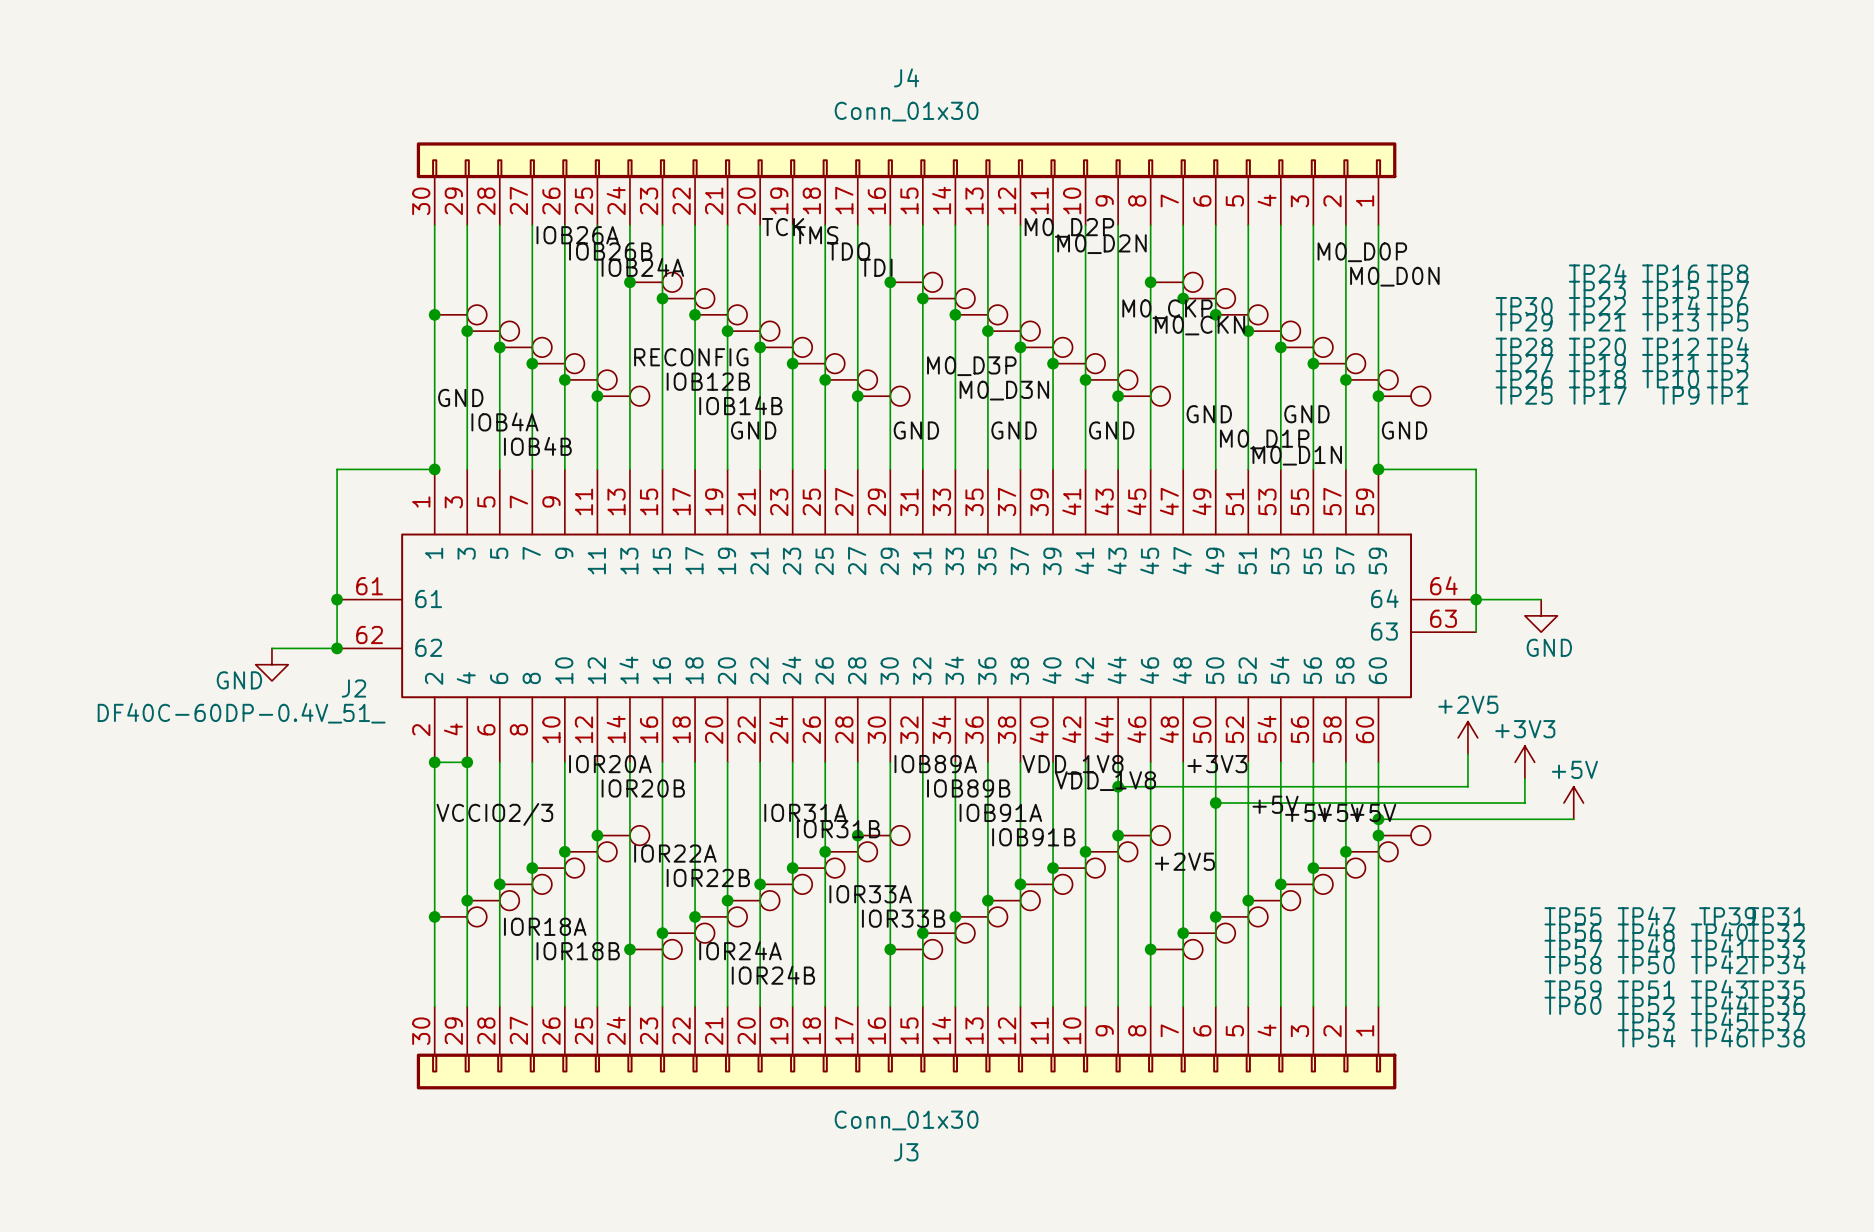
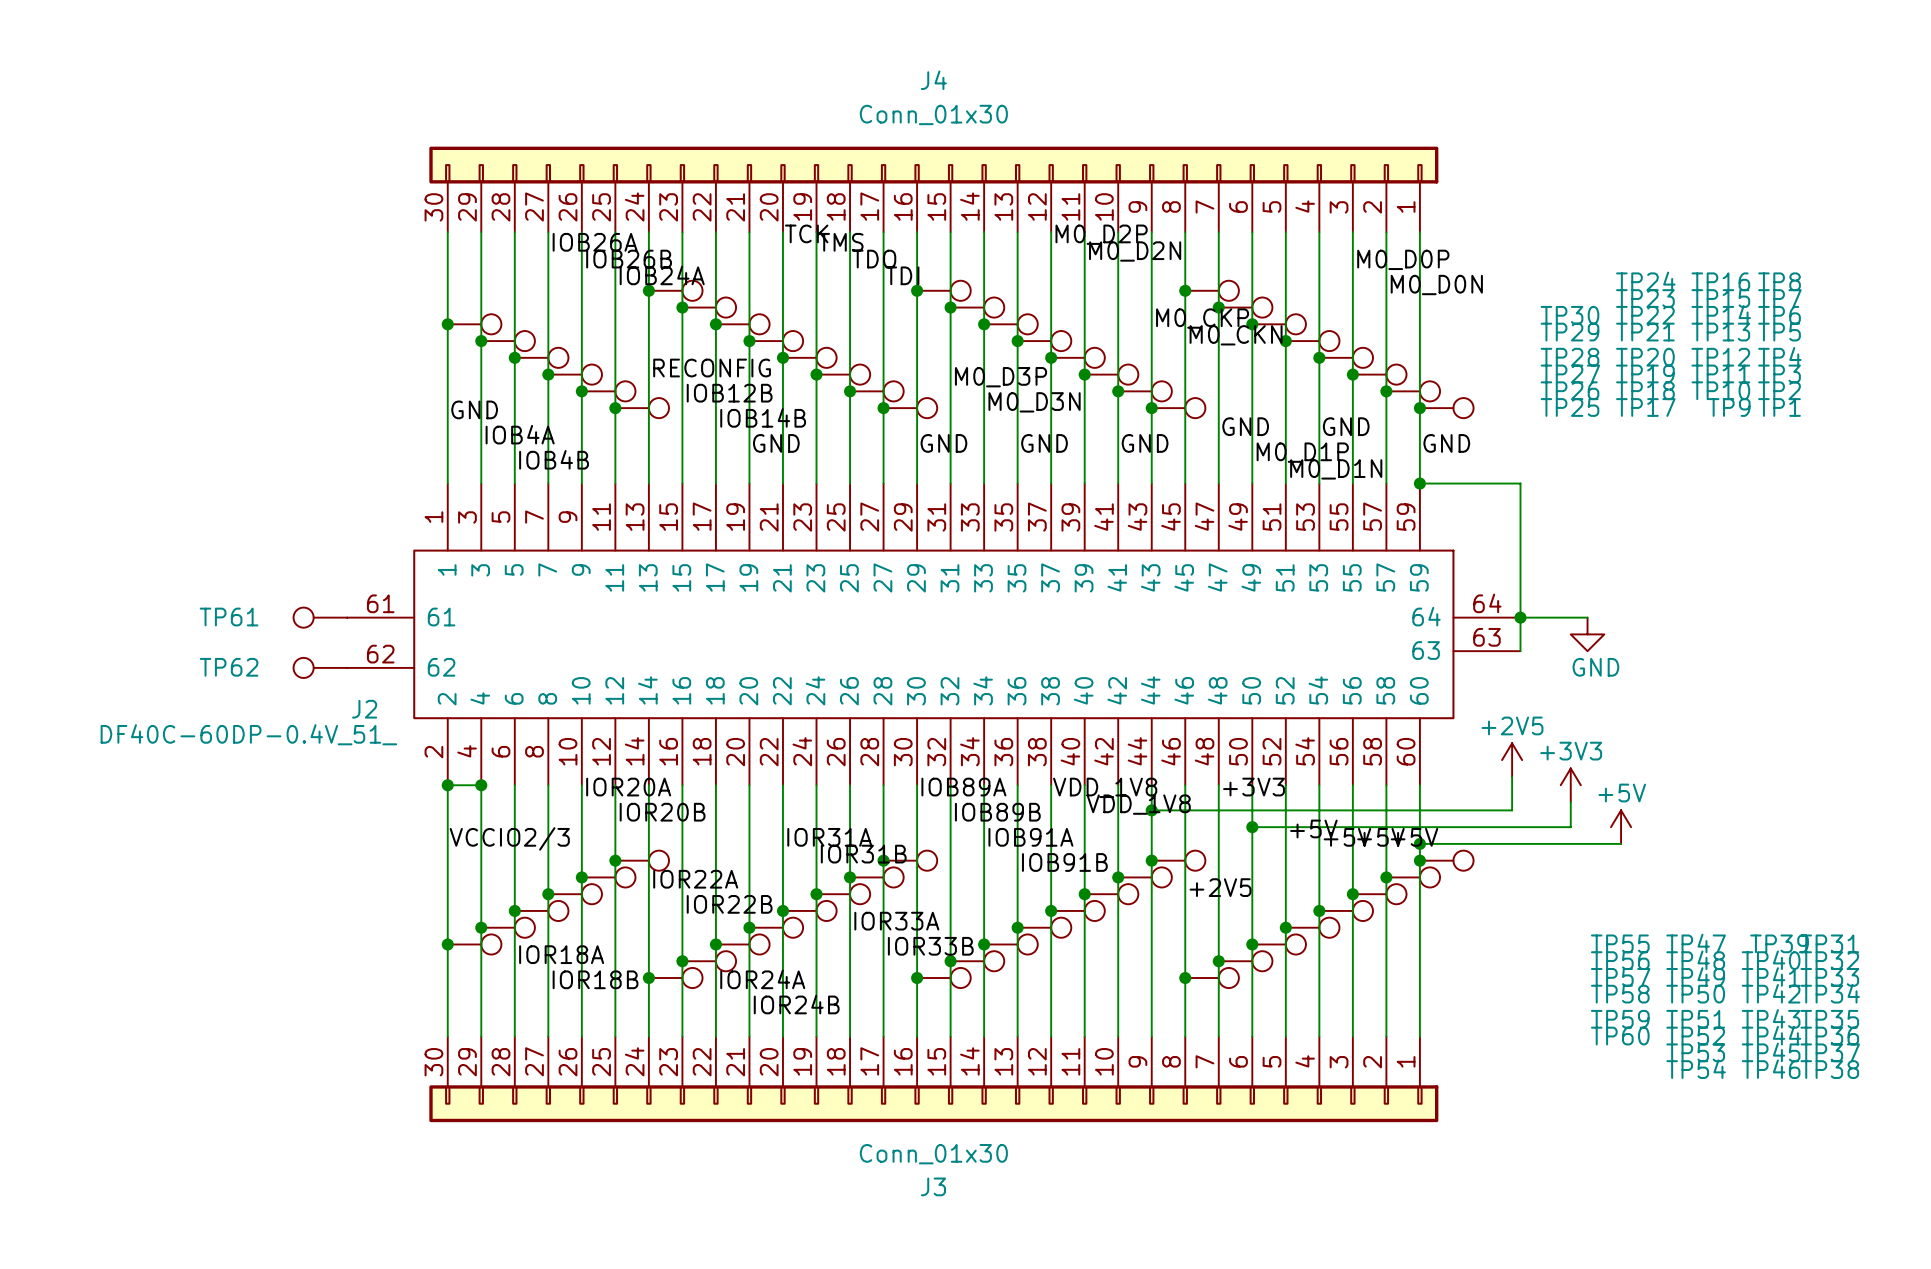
wire: (434, 469) (337, 469) (337, 648) (271, 648) -> none
junction: (434, 469) -> none
TP61: none -> (320, 617)
junction: (337, 599) -> none
TP62: none -> (320, 667)
junction: (337, 648) -> none
power symbol: GND (271, 664) -> none

